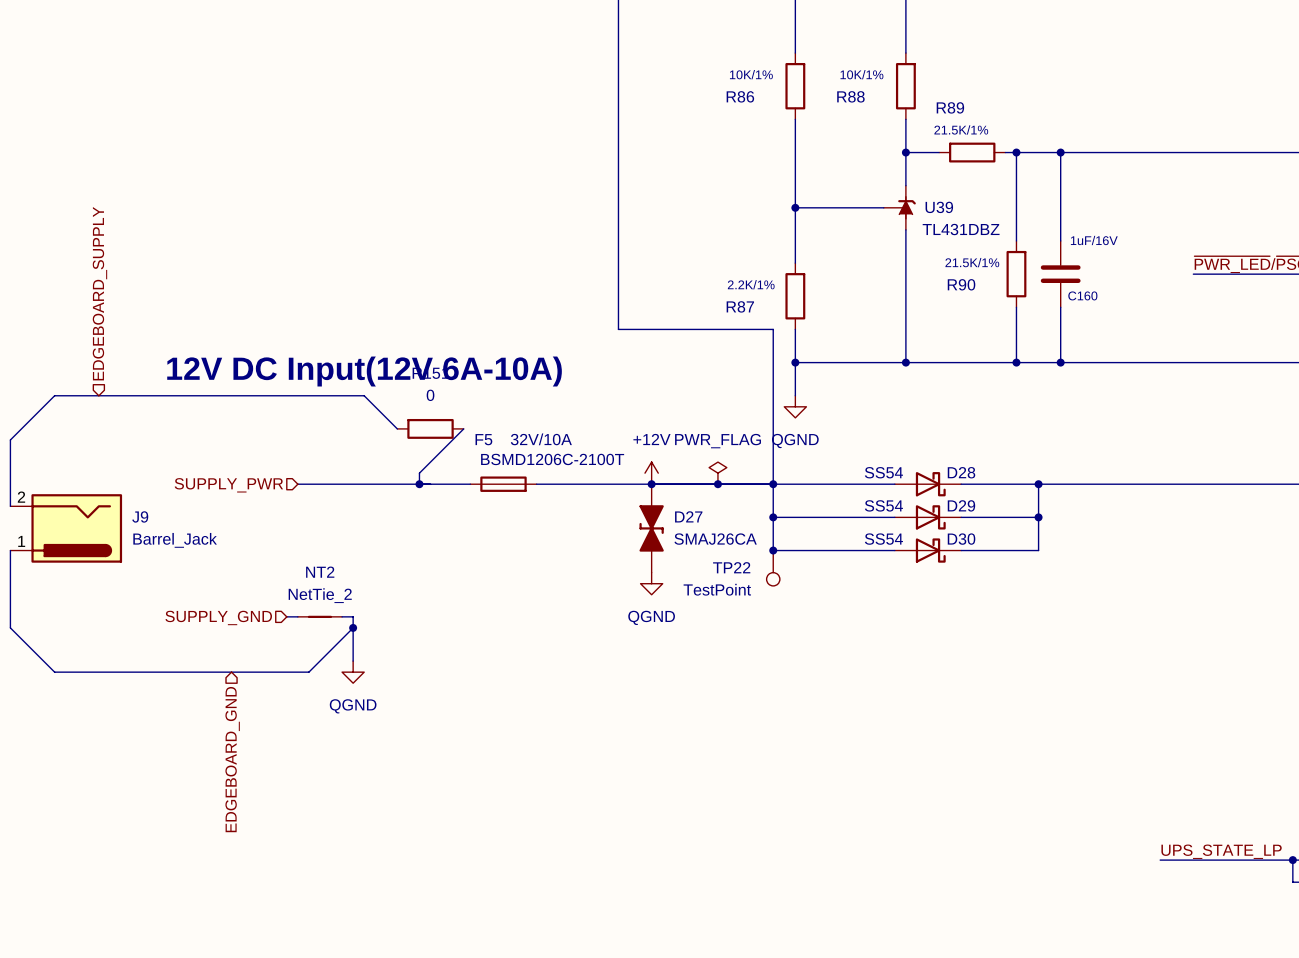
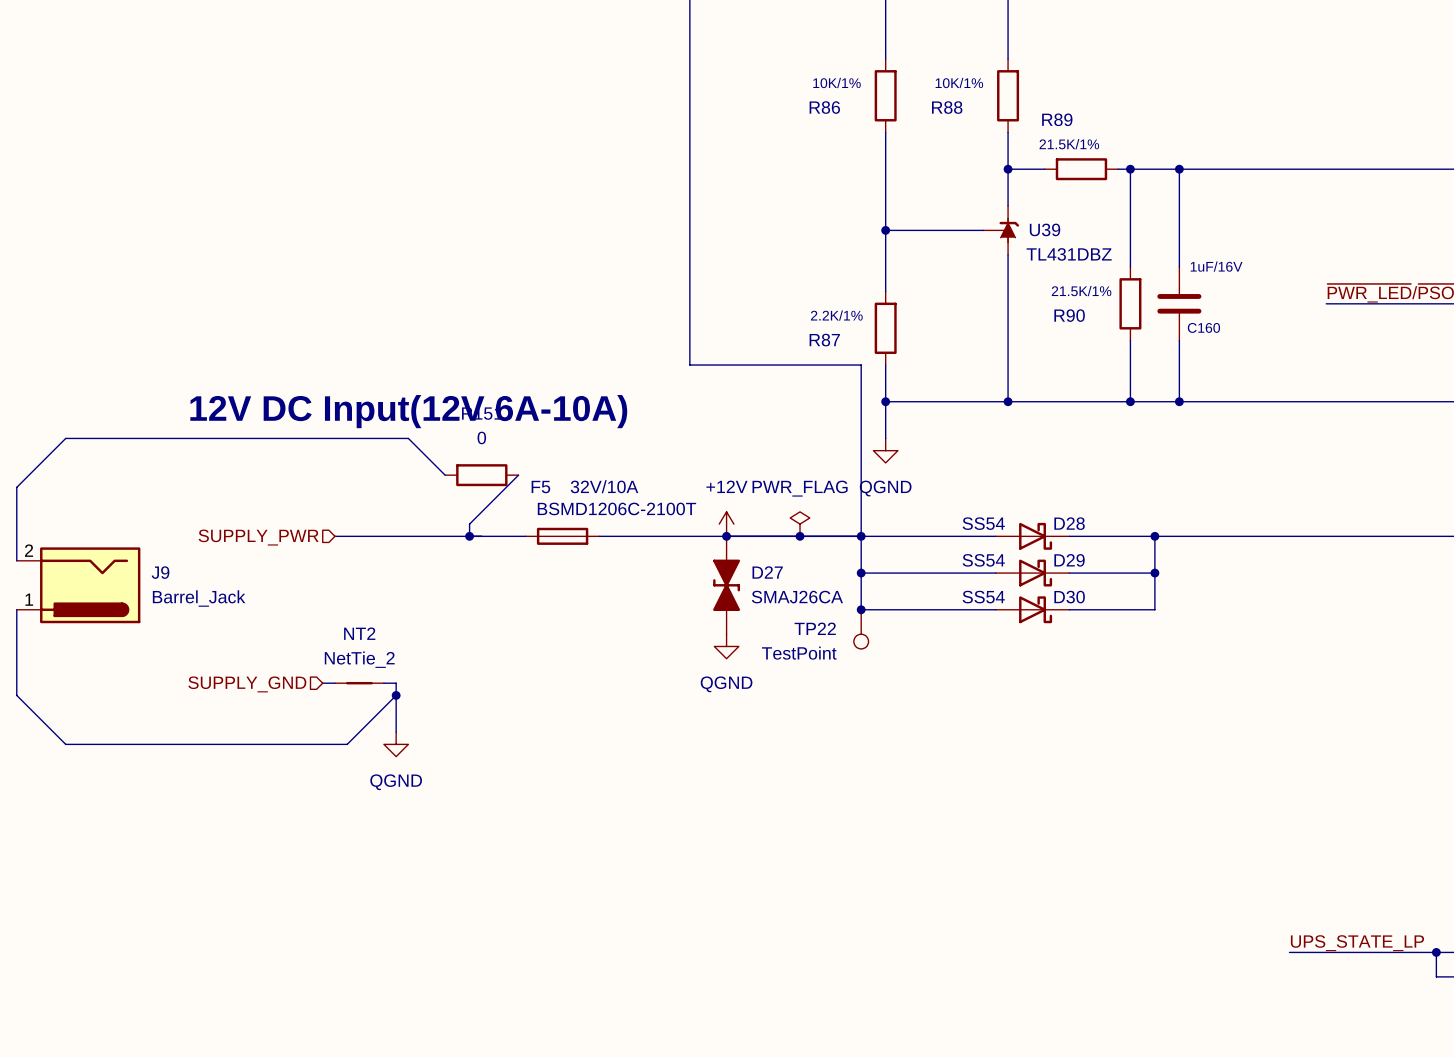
hierarchical label: EDGEBOARD_SUPPLY (99, 293) -> none
hierarchical label: EDGEBOARD_GND (232, 759) -> none

